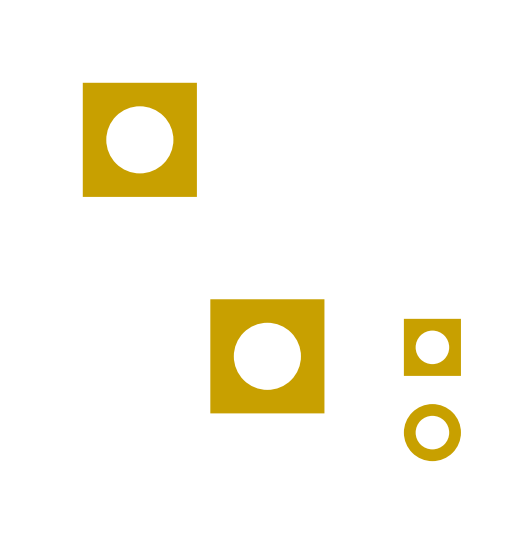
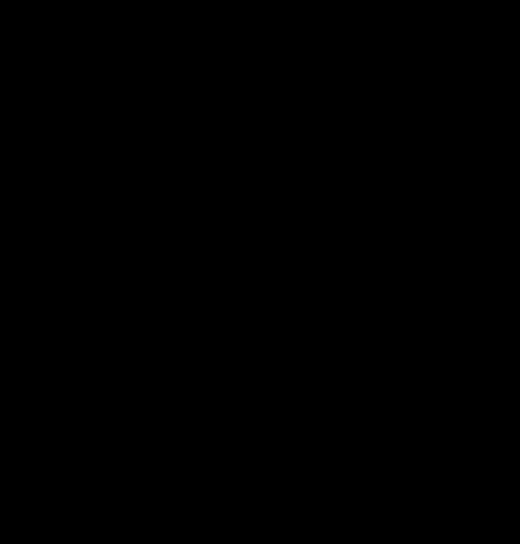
part: (139, 139) -> none
part: (267, 356) -> none
part: (432, 389) -> none

